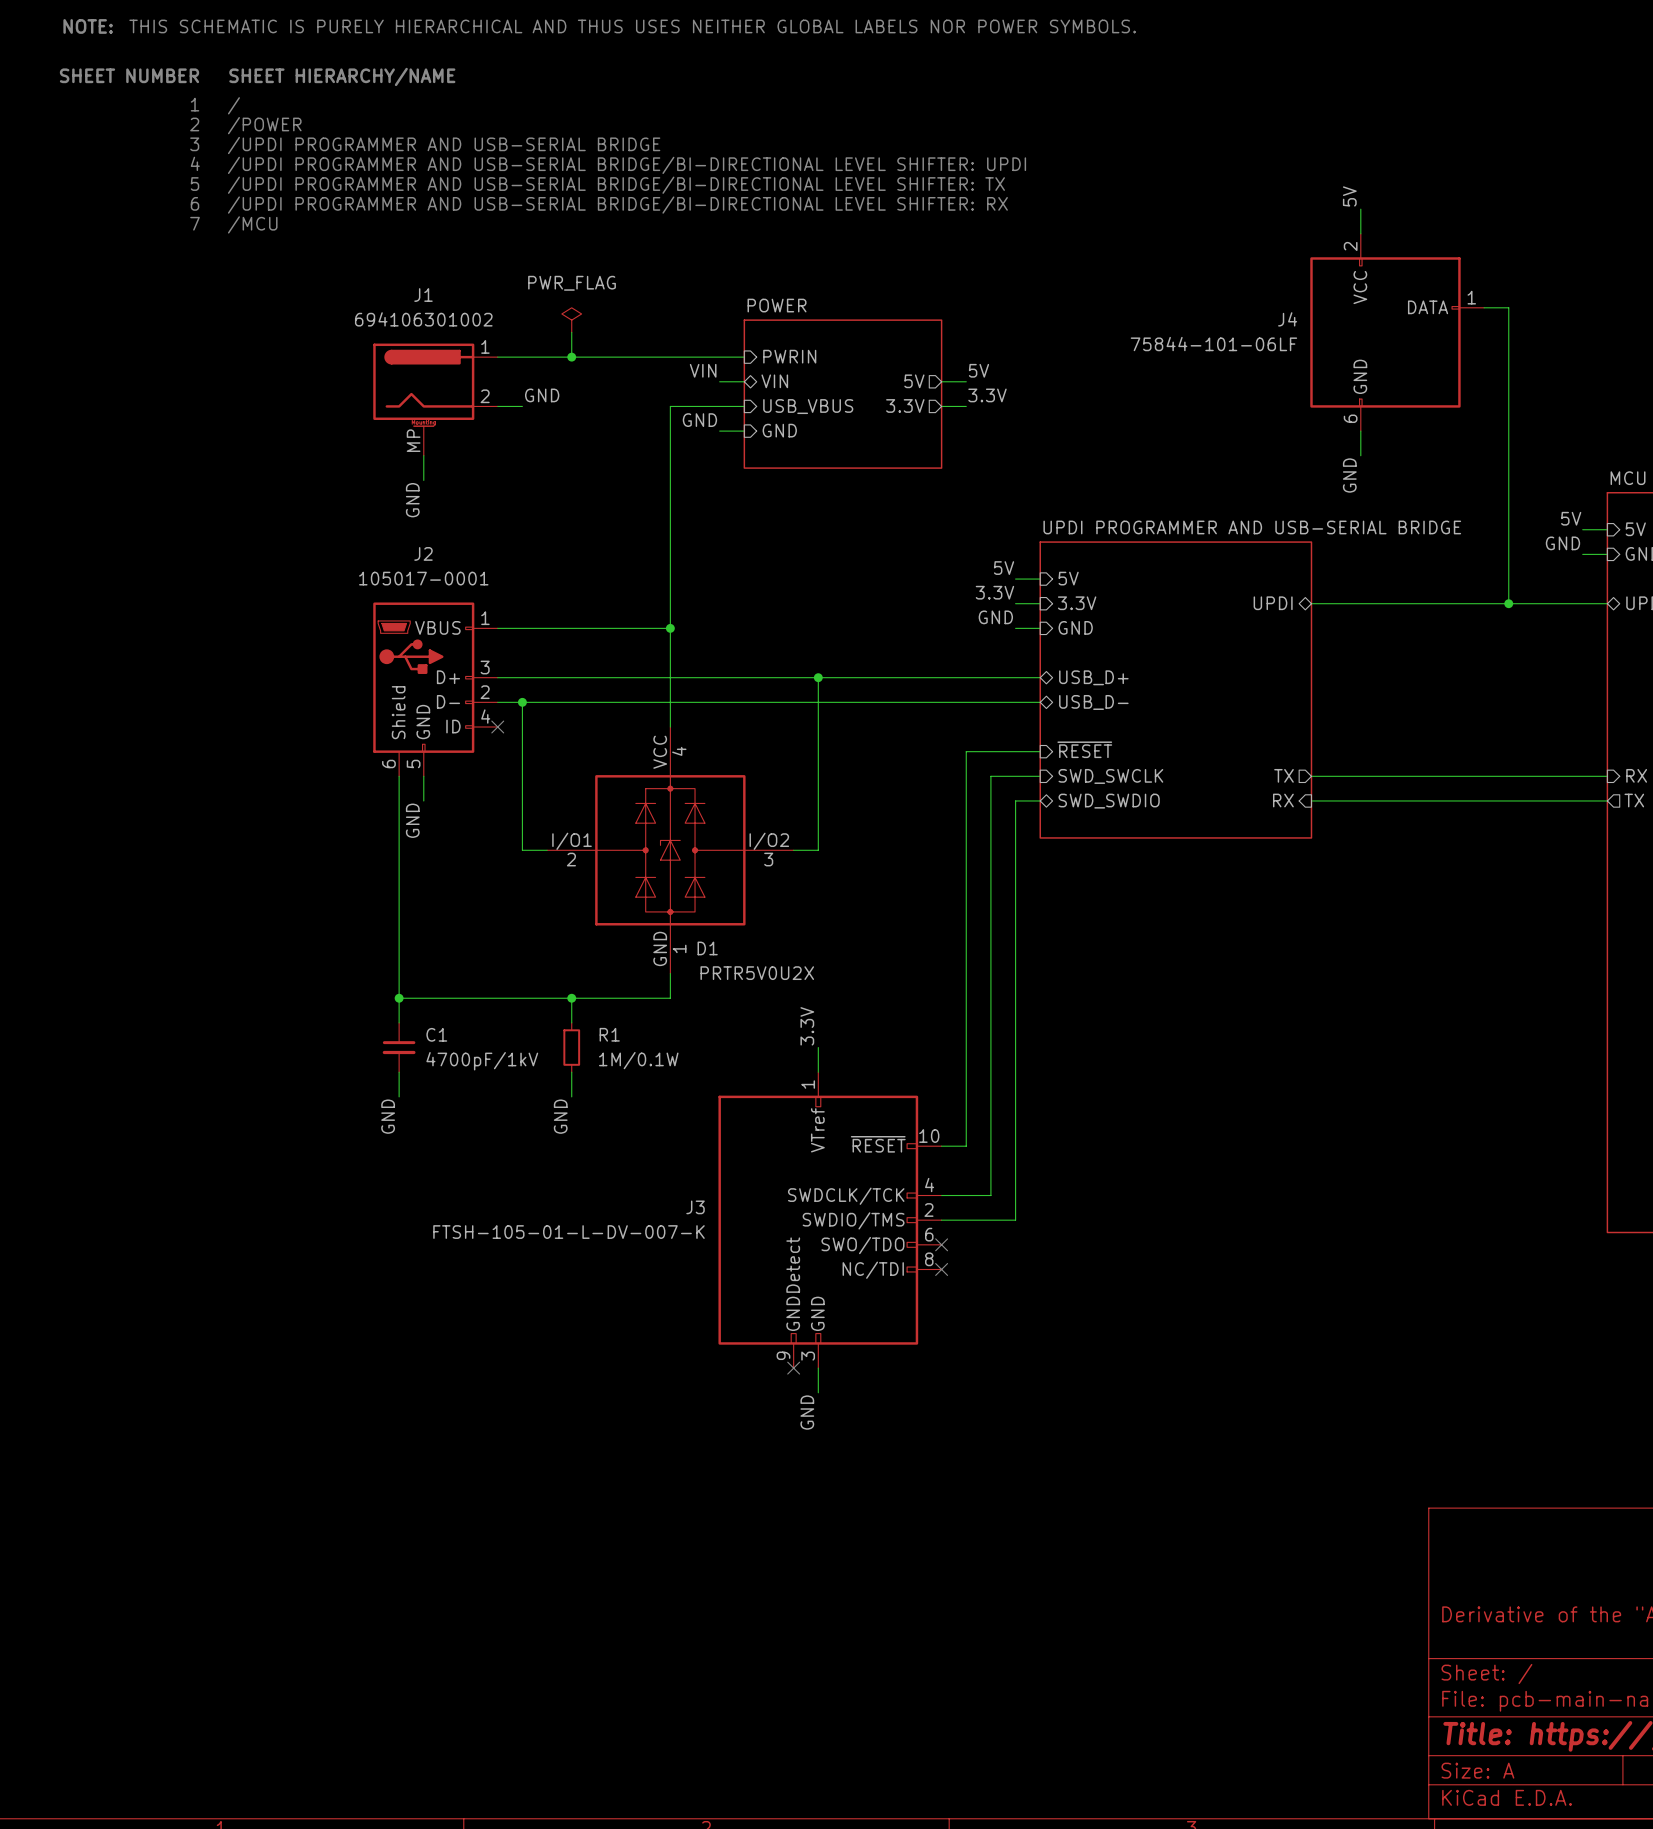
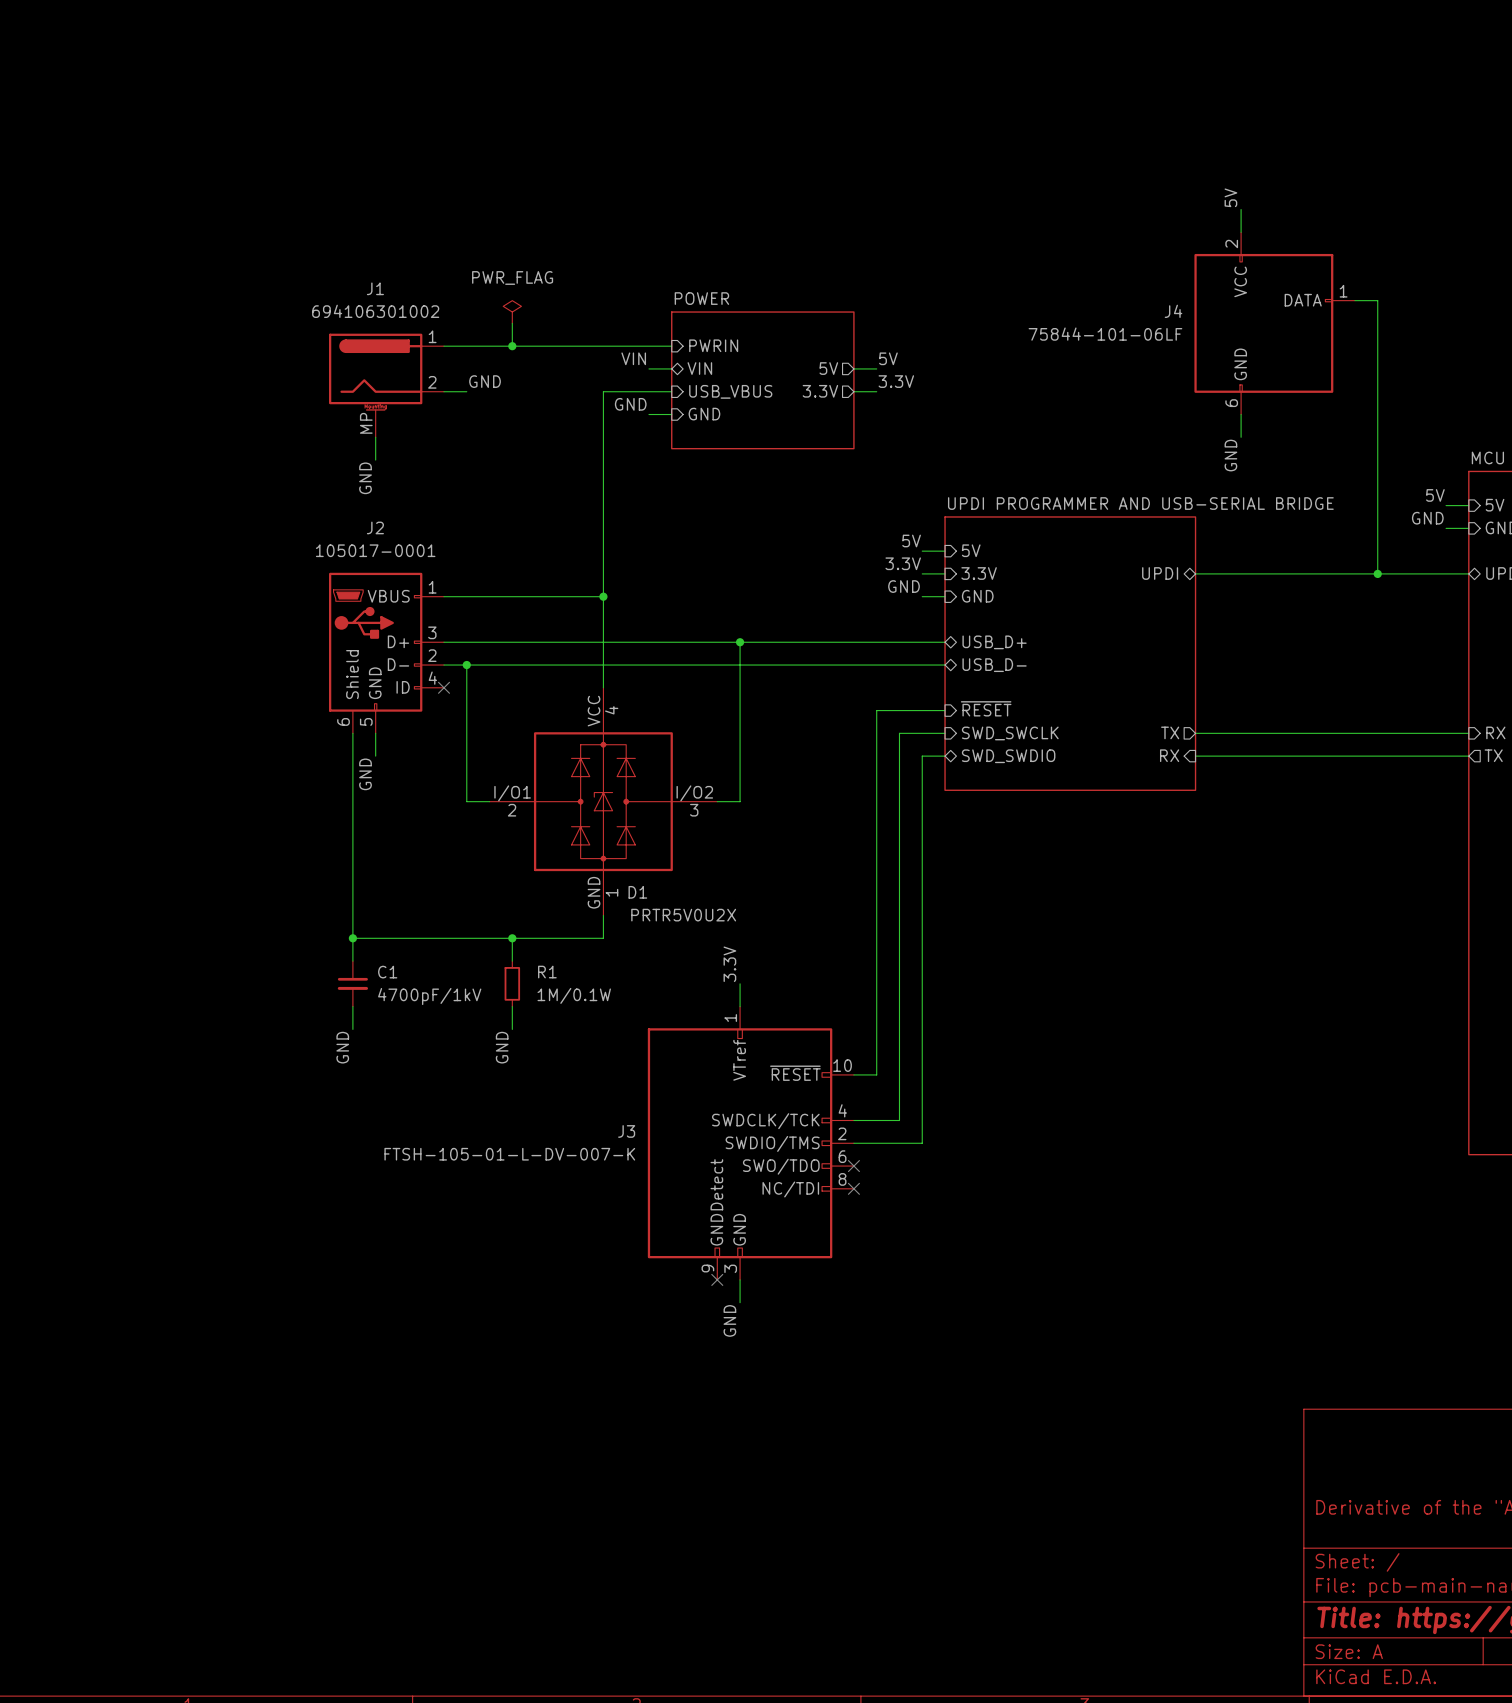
text: NOTE: (88, 26) -> none
text: THIS SCHEMATIC IS PURELY HIERARCHICAL AND THUS USES NEITHER GLOBAL LABELS NOR POWER SYMBOLS. (632, 26) -> none
text: SHEET NUMBER (129, 75) -> none
text: SHEET HIERARCHY/NAME (342, 76) -> none
text: 1 (195, 104) -> none
text: / (233, 105) -> none
text: 2 (194, 124) -> none
text: /POWER (264, 125) -> none
text: 3 (194, 144) -> none
text: /UPDI PROGRAMMER AND USB-SERIAL BRIDGE (444, 145) -> none
text: 4 (195, 163) -> none
text: /UPDI PROGRAMMER AND USB-SERIAL BRIDGE/BI-DIRECTIONAL LEVEL SHIFTER: UPDI (627, 165) -> none
text: 5 (195, 184) -> none
text: /UPDI PROGRAMMER AND USB-SERIAL BRIDGE/BI-DIRECTIONAL LEVEL SHIFTER: TX (616, 185) -> none
text: 6 (195, 203) -> none
text: /UPDI PROGRAMMER AND USB-SERIAL BRIDGE/BI-DIRECTIONAL LEVEL SHIFTER: RX (617, 205) -> none
text: 7 (195, 223) -> none
text: /MCU (252, 224) -> none

